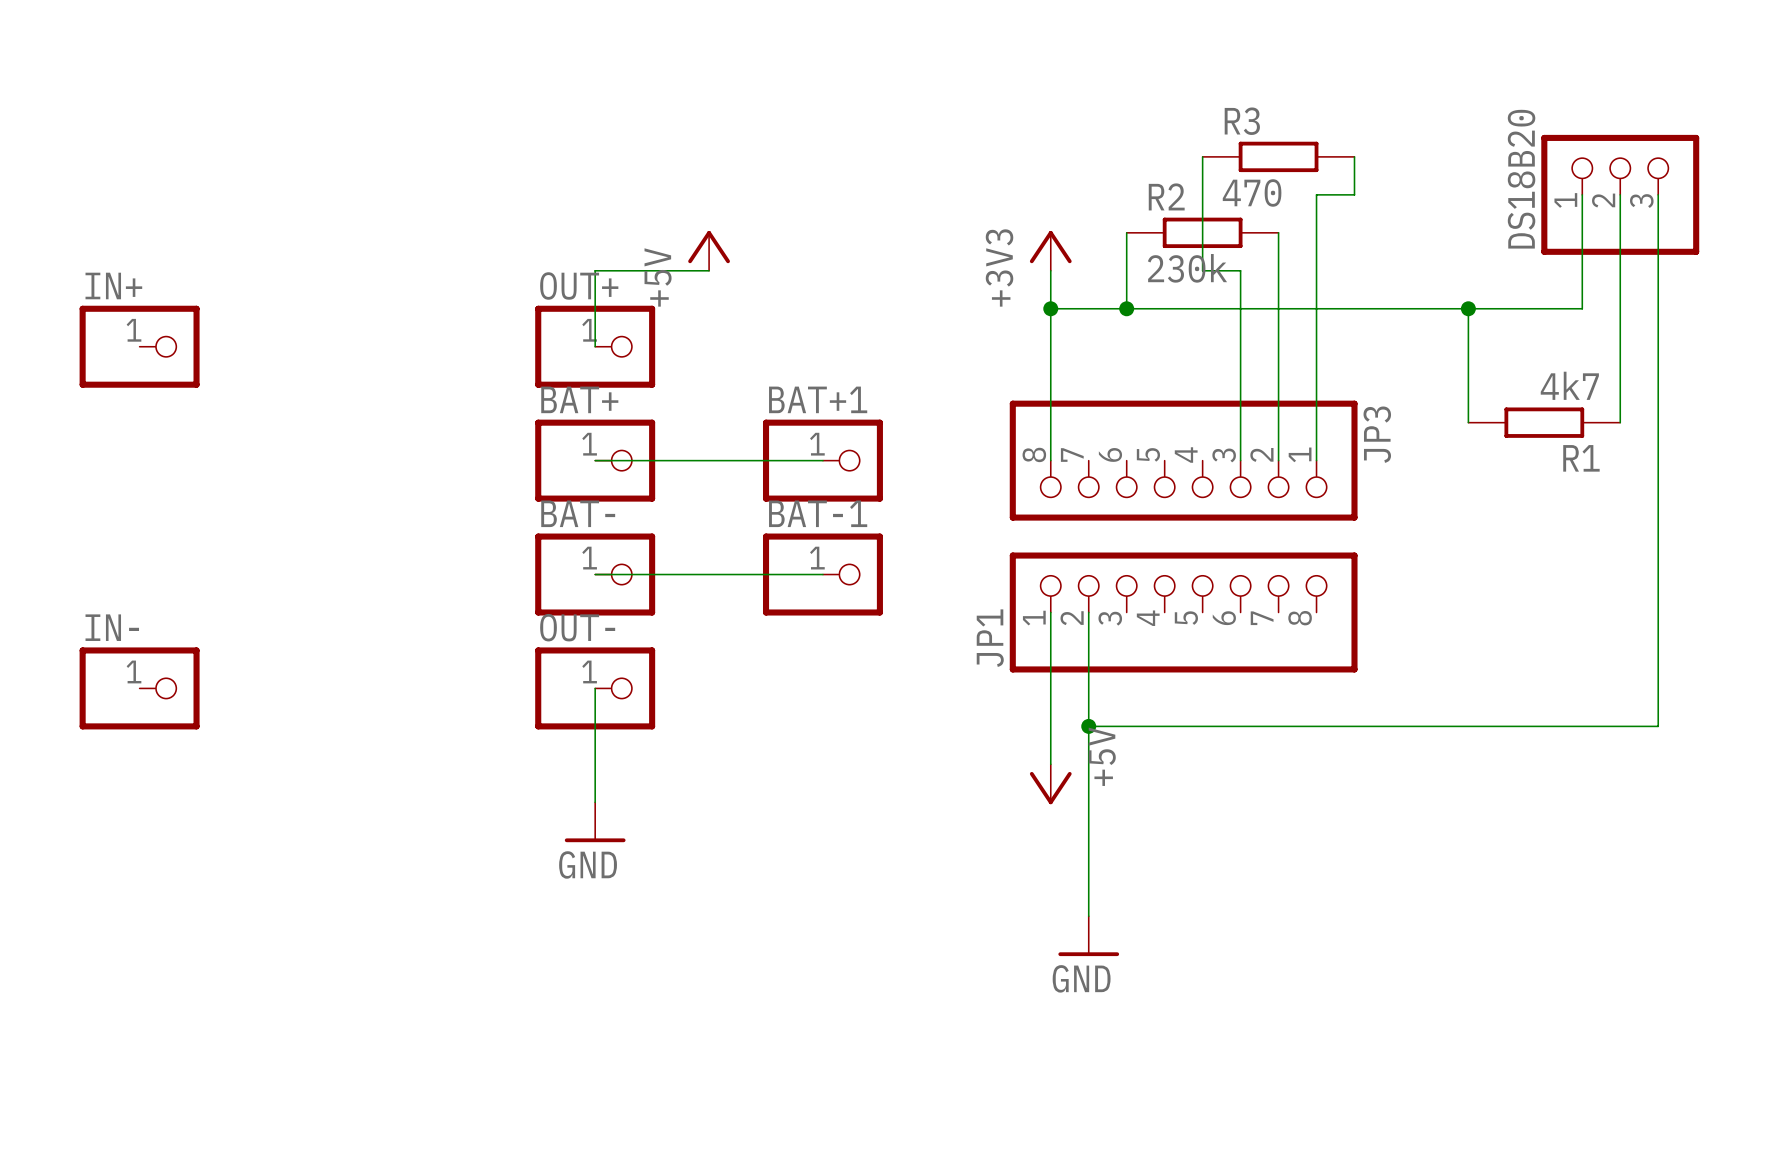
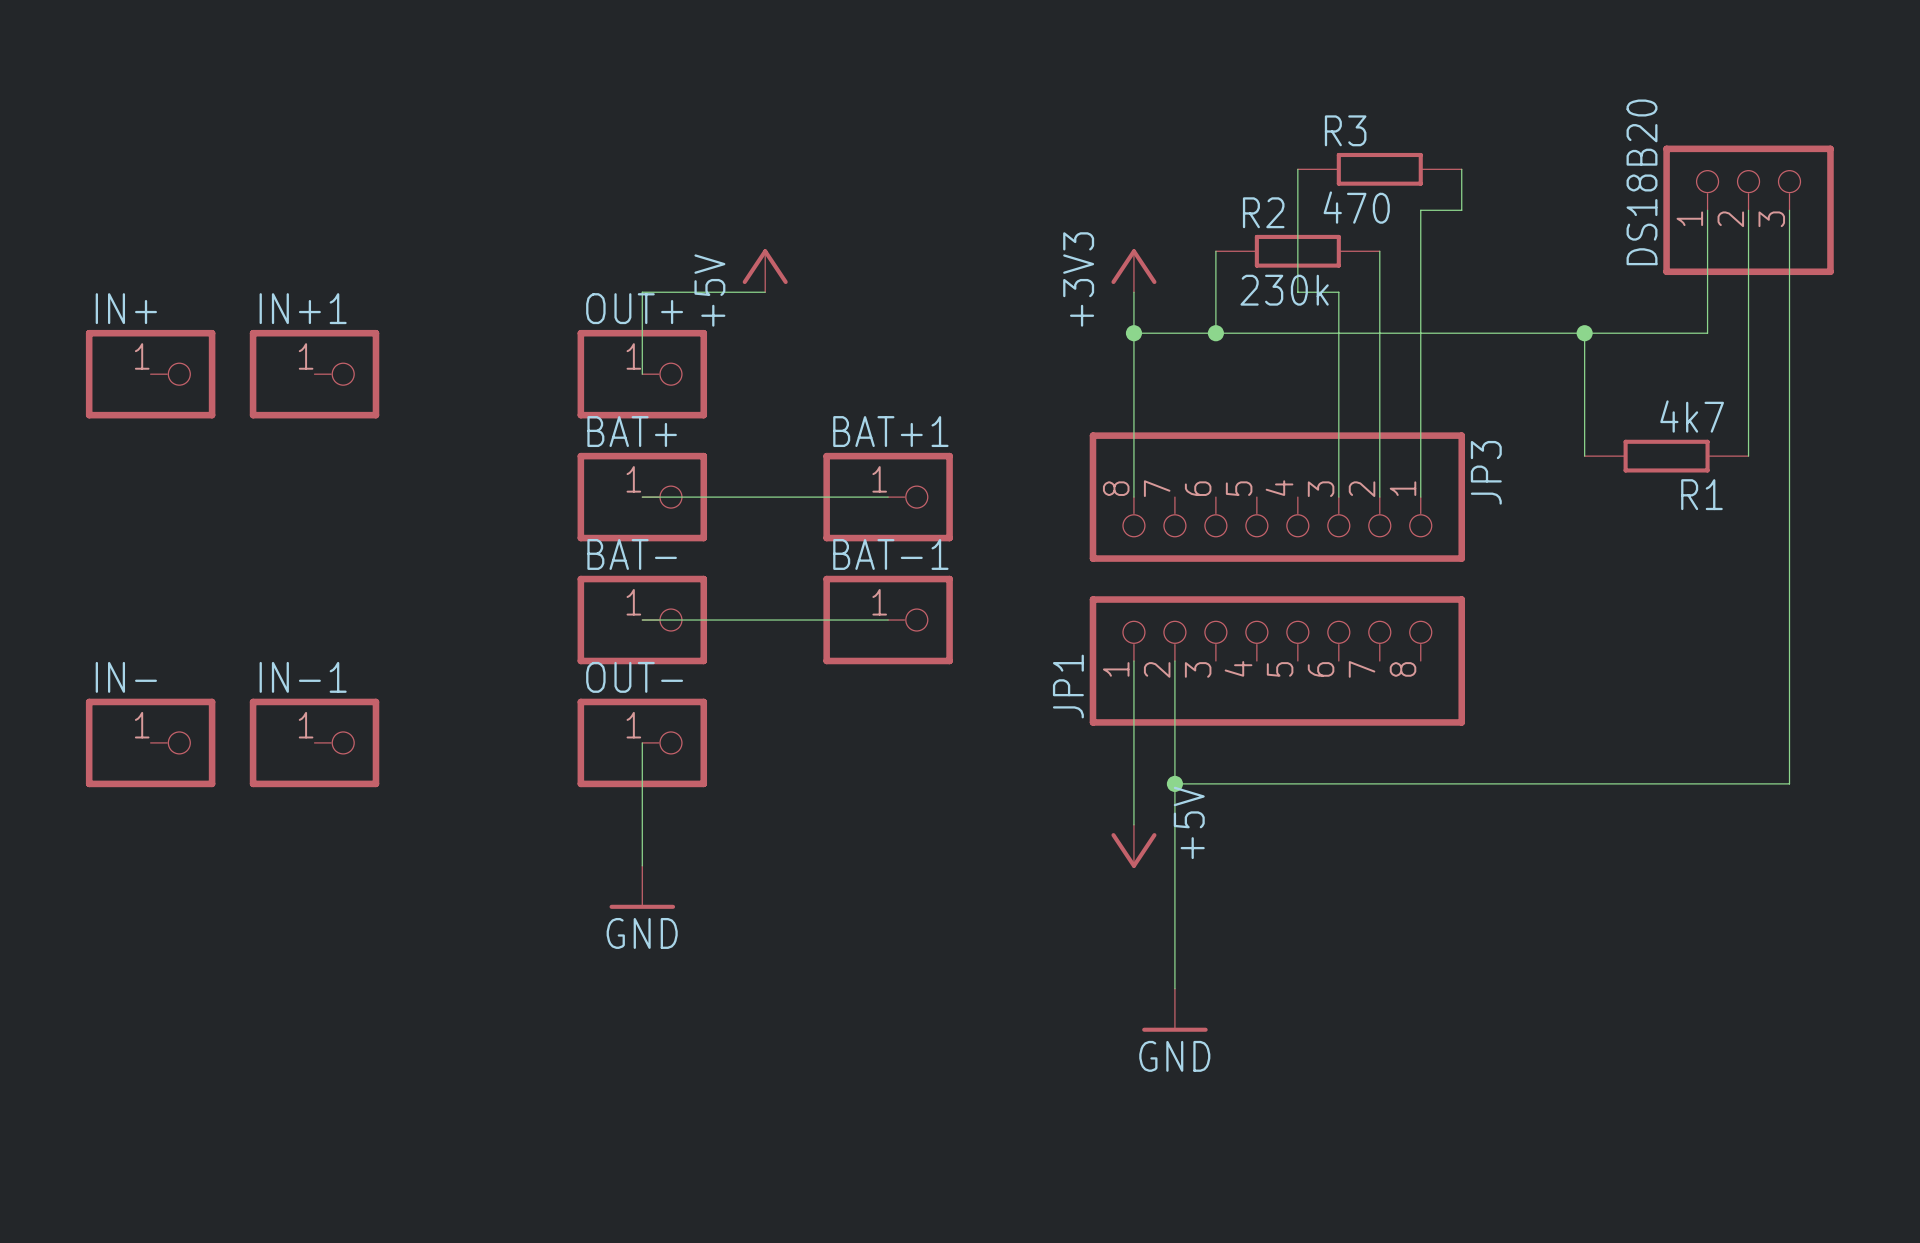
IN+1: none -> (314, 374)
IN-1: none -> (314, 742)

